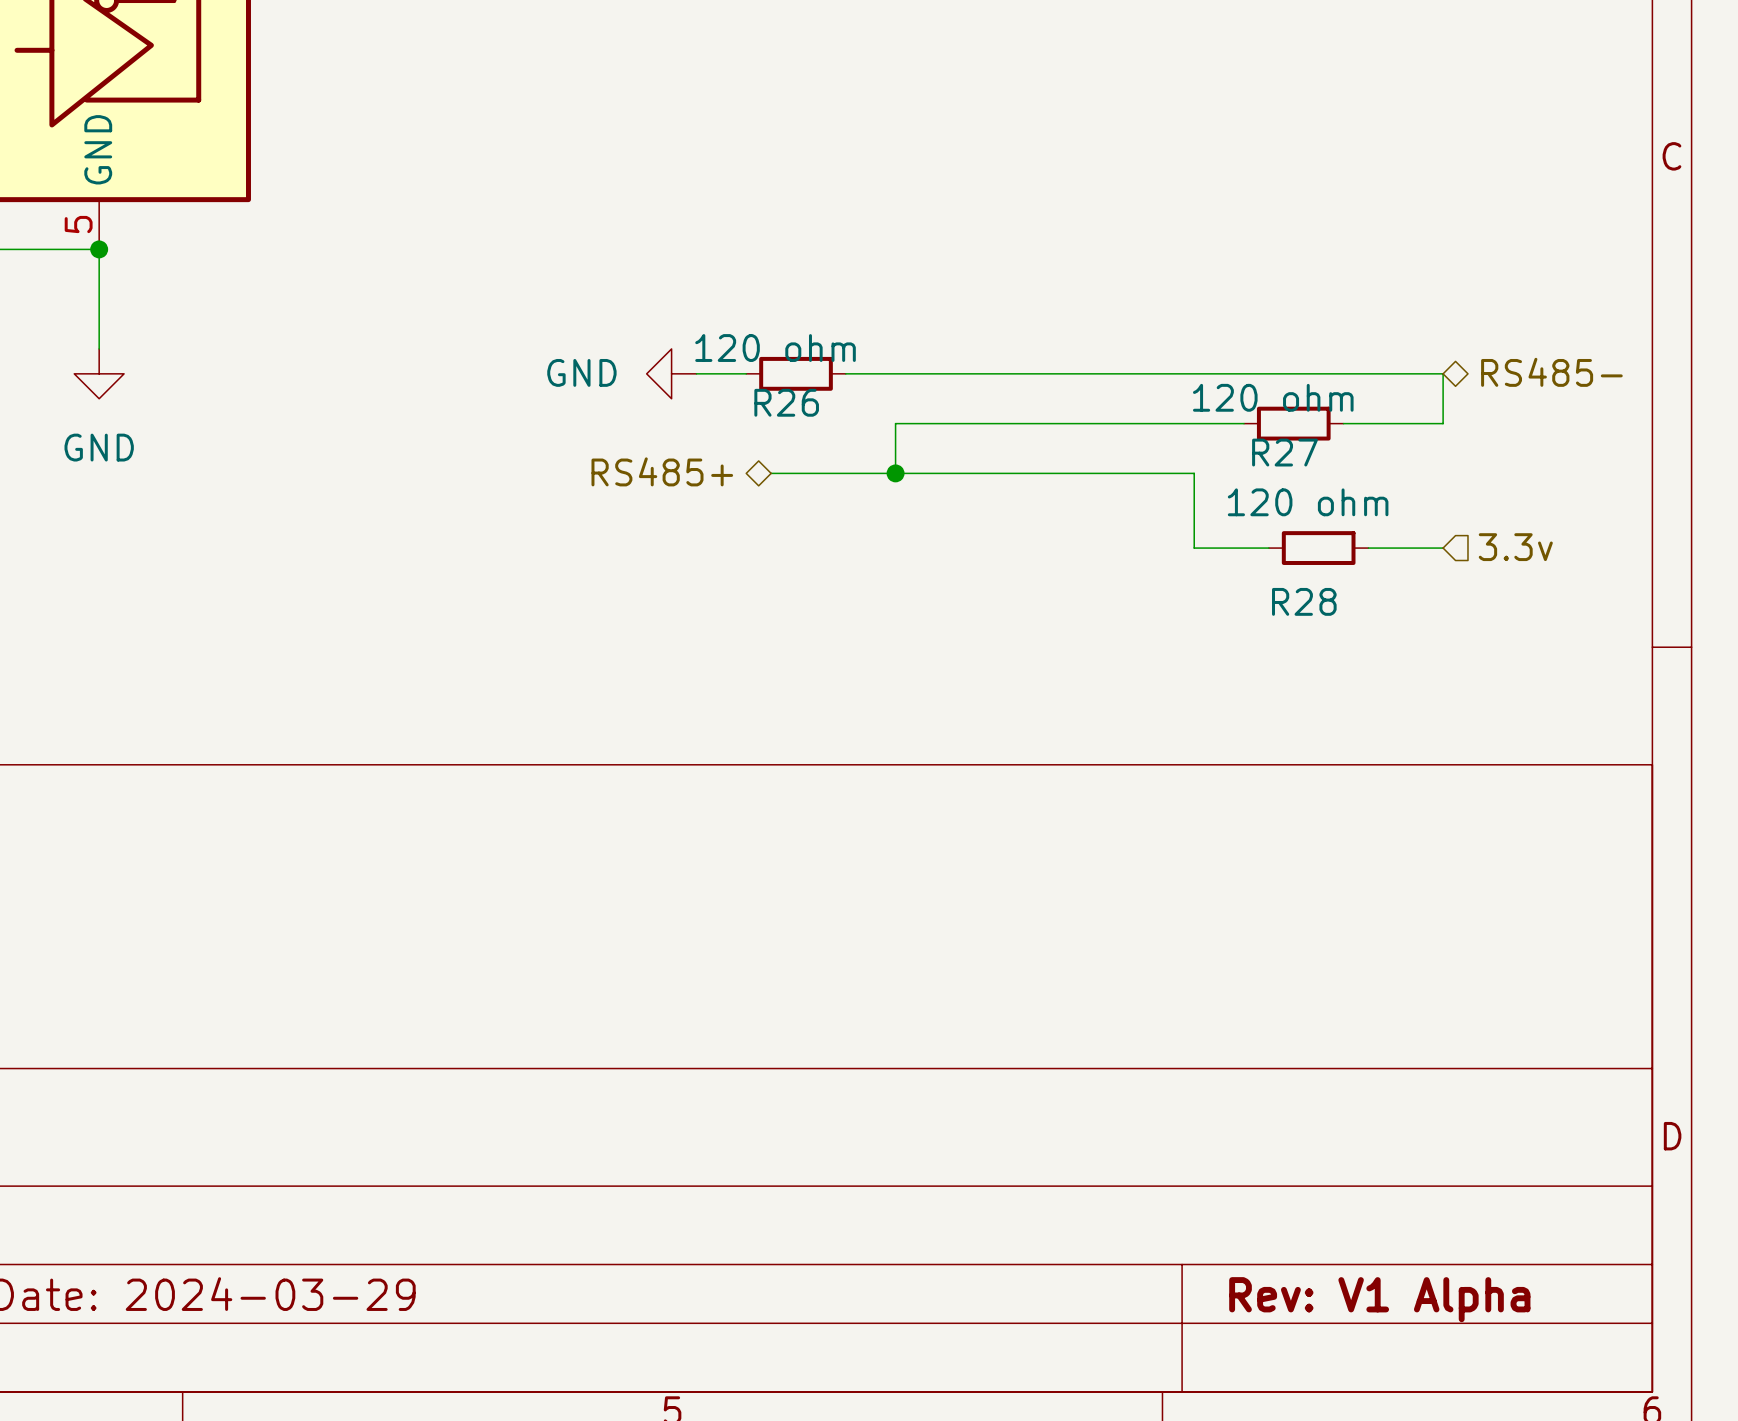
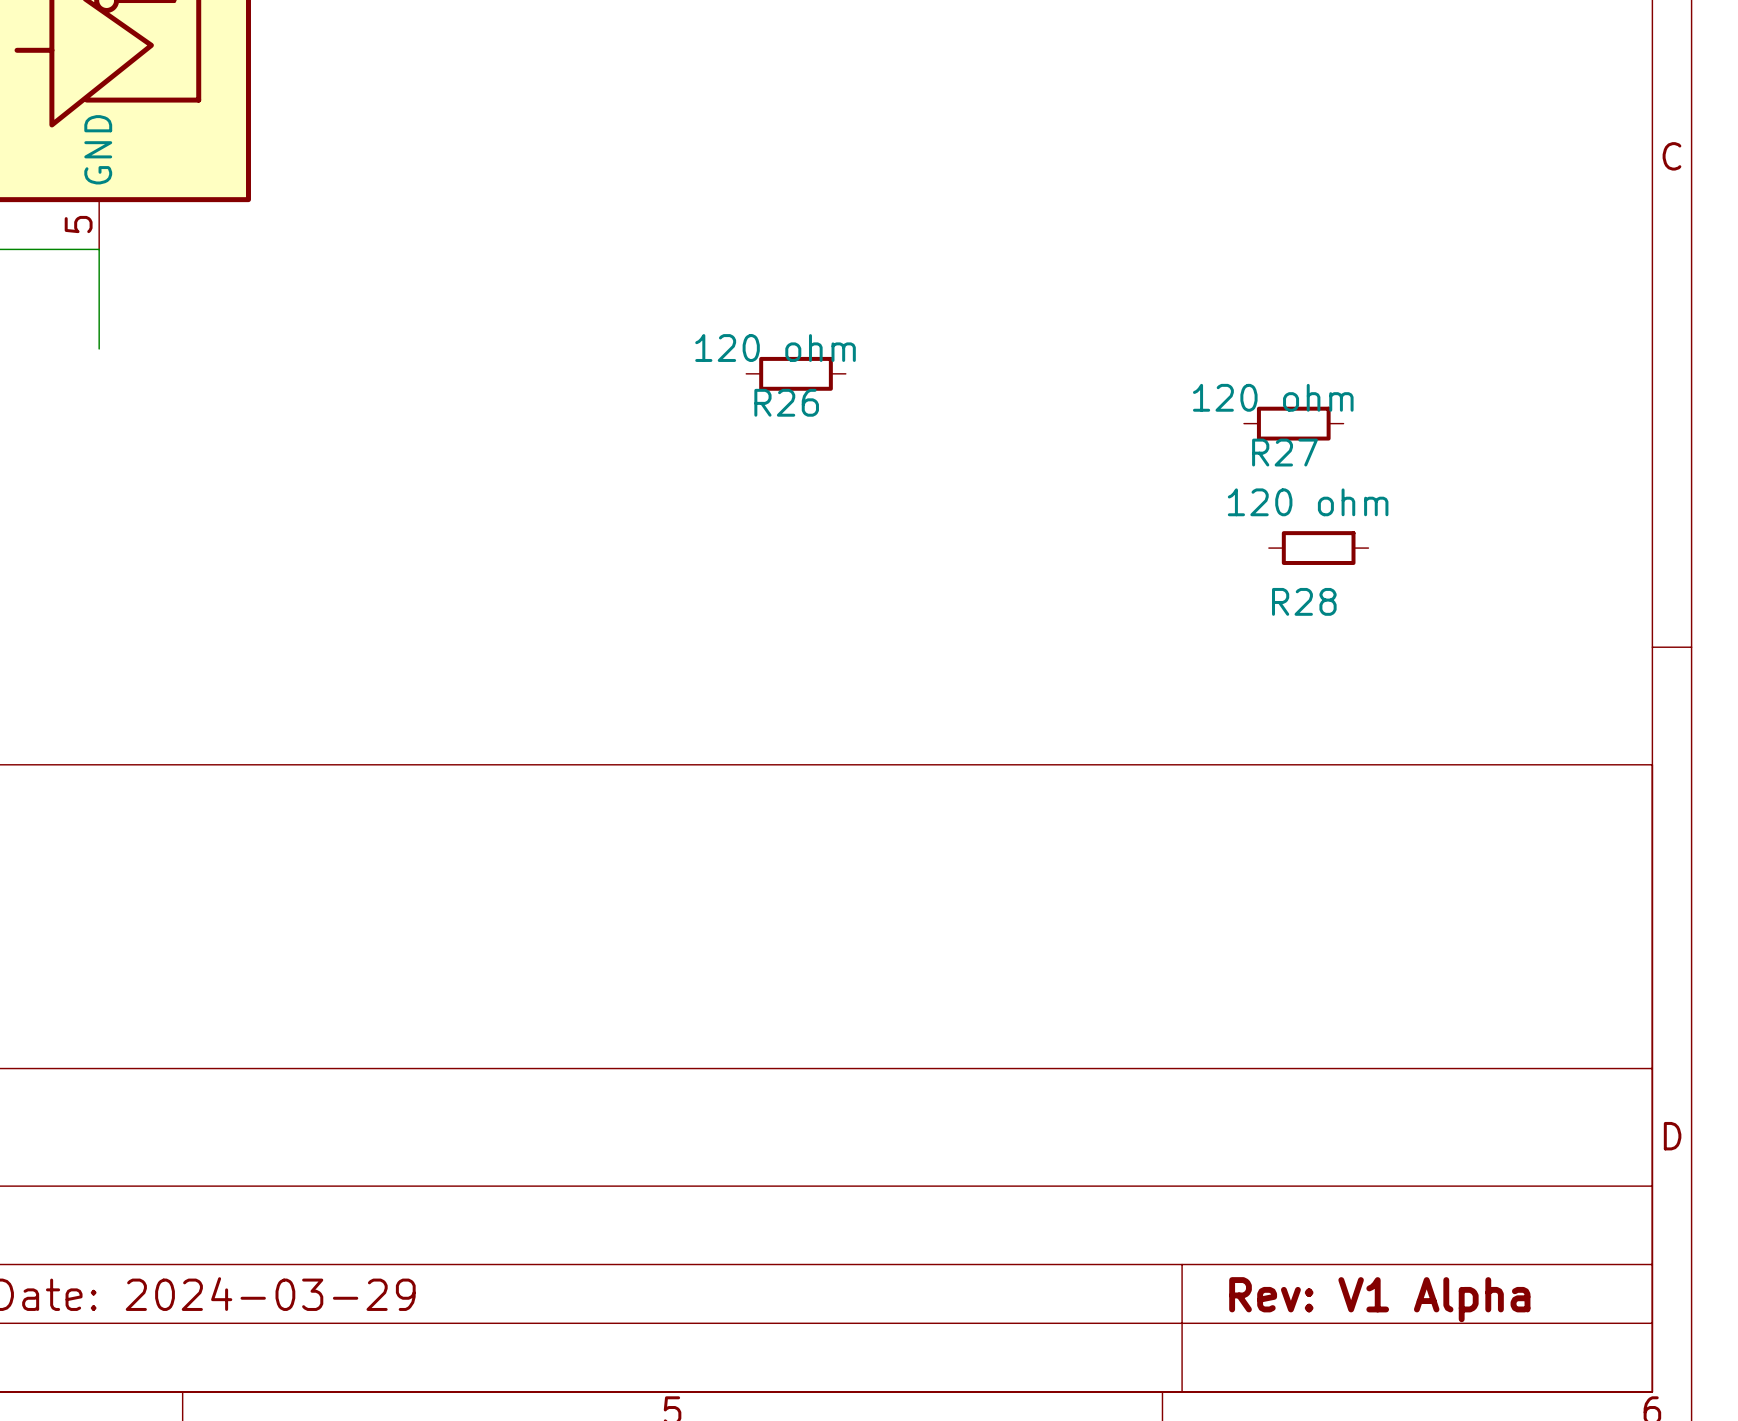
junction: (99, 249) -> none
hierarchical label: RS485- (1551, 372) -> none
power symbol: GND (99, 373) -> none
power symbol: GND (671, 373) -> none
wire: (696, 373) (746, 373) -> none
wire: (845, 373) (1443, 373) (1443, 423) (1343, 423) -> none
wire: (1244, 423) (895, 423) (895, 473) -> none
hierarchical label: RS485+ (662, 471) -> none
wire: (771, 473) (1194, 473) (1194, 548) (1268, 548) -> none
junction: (895, 473) -> none
hierarchical label: 3.3v (1515, 547) -> none
wire: (1368, 548) (1443, 548) -> none

